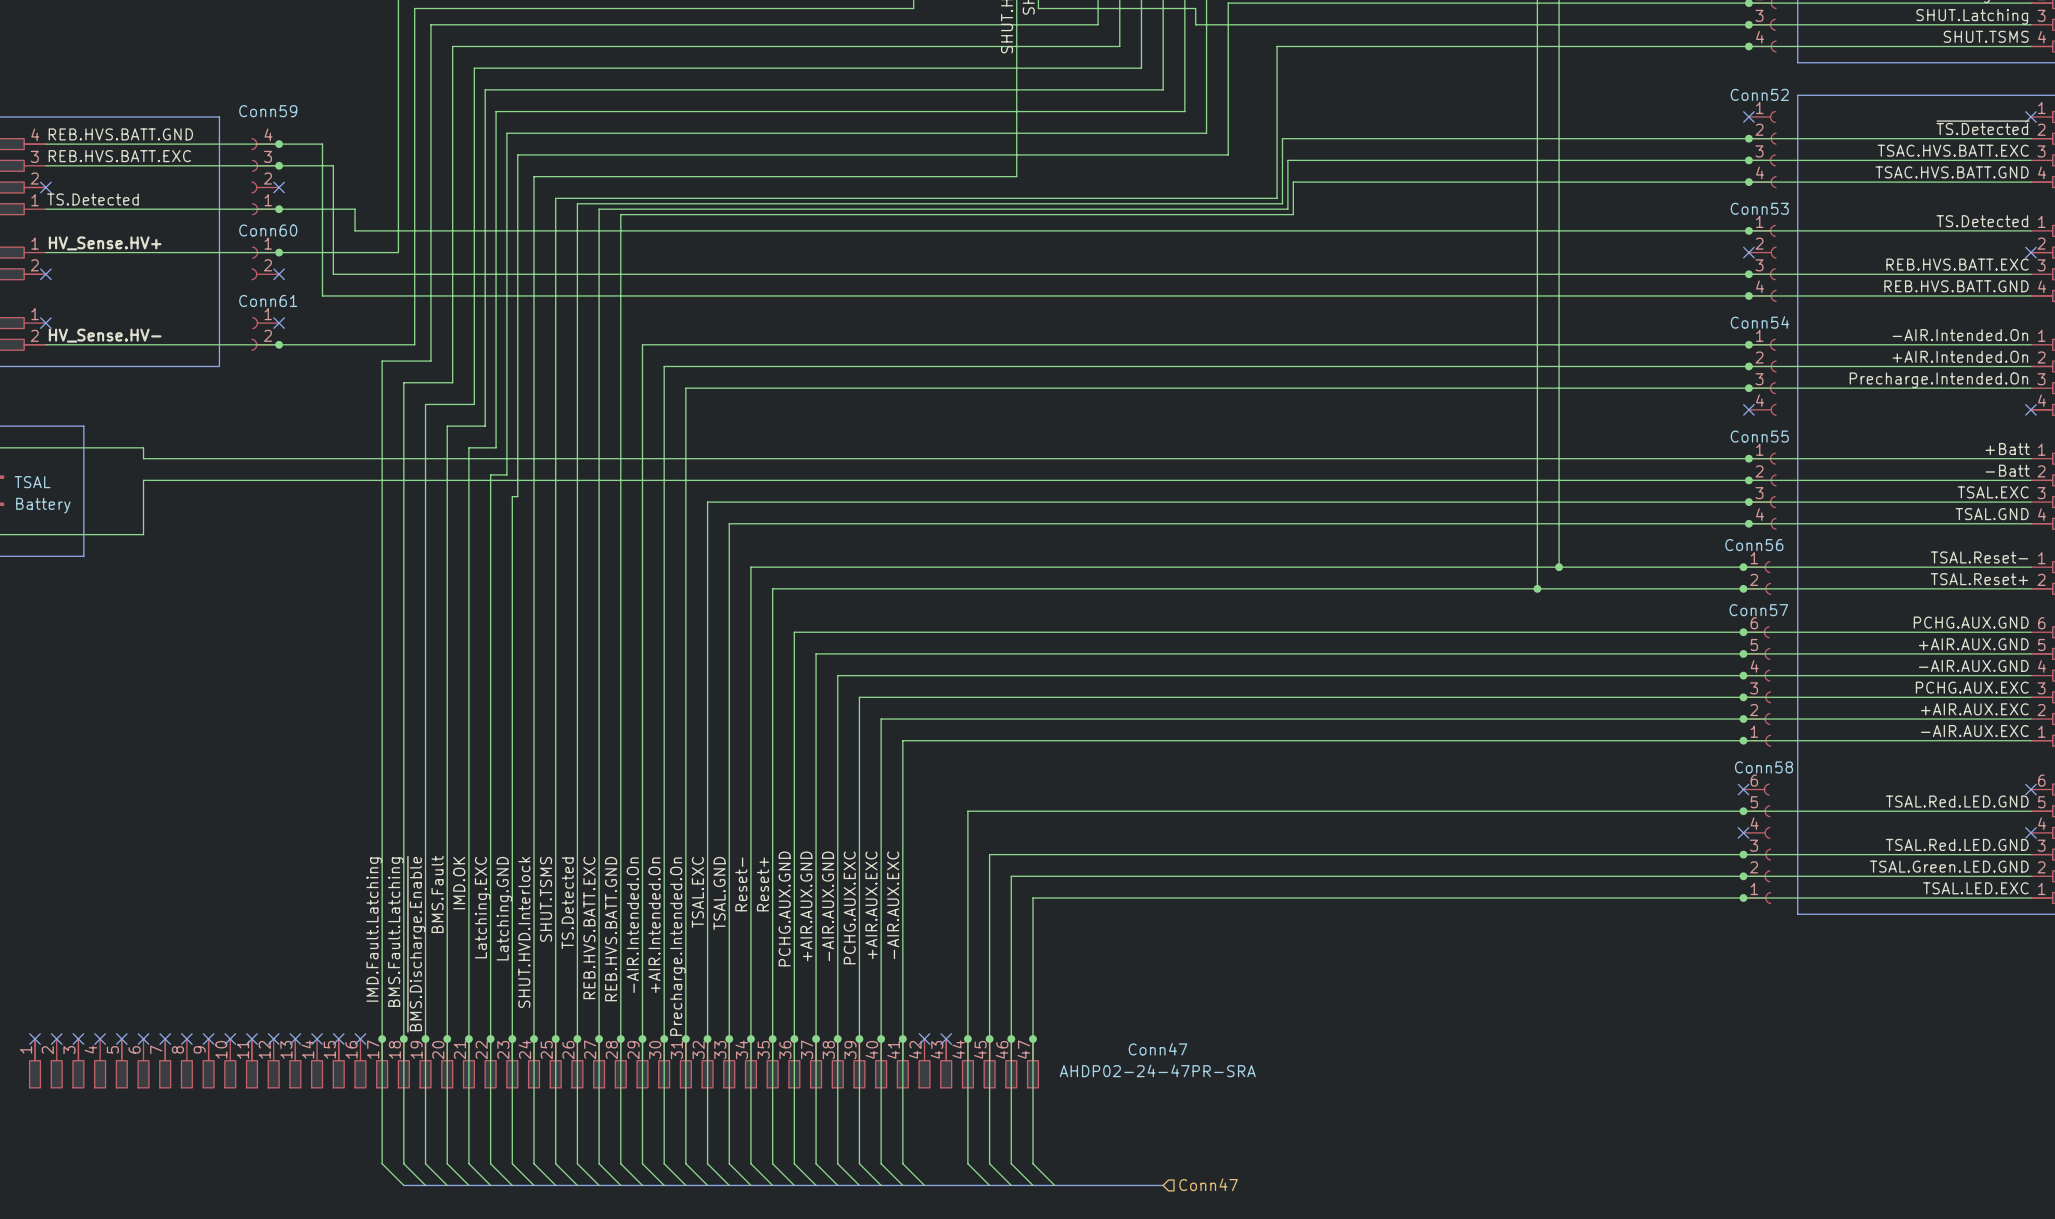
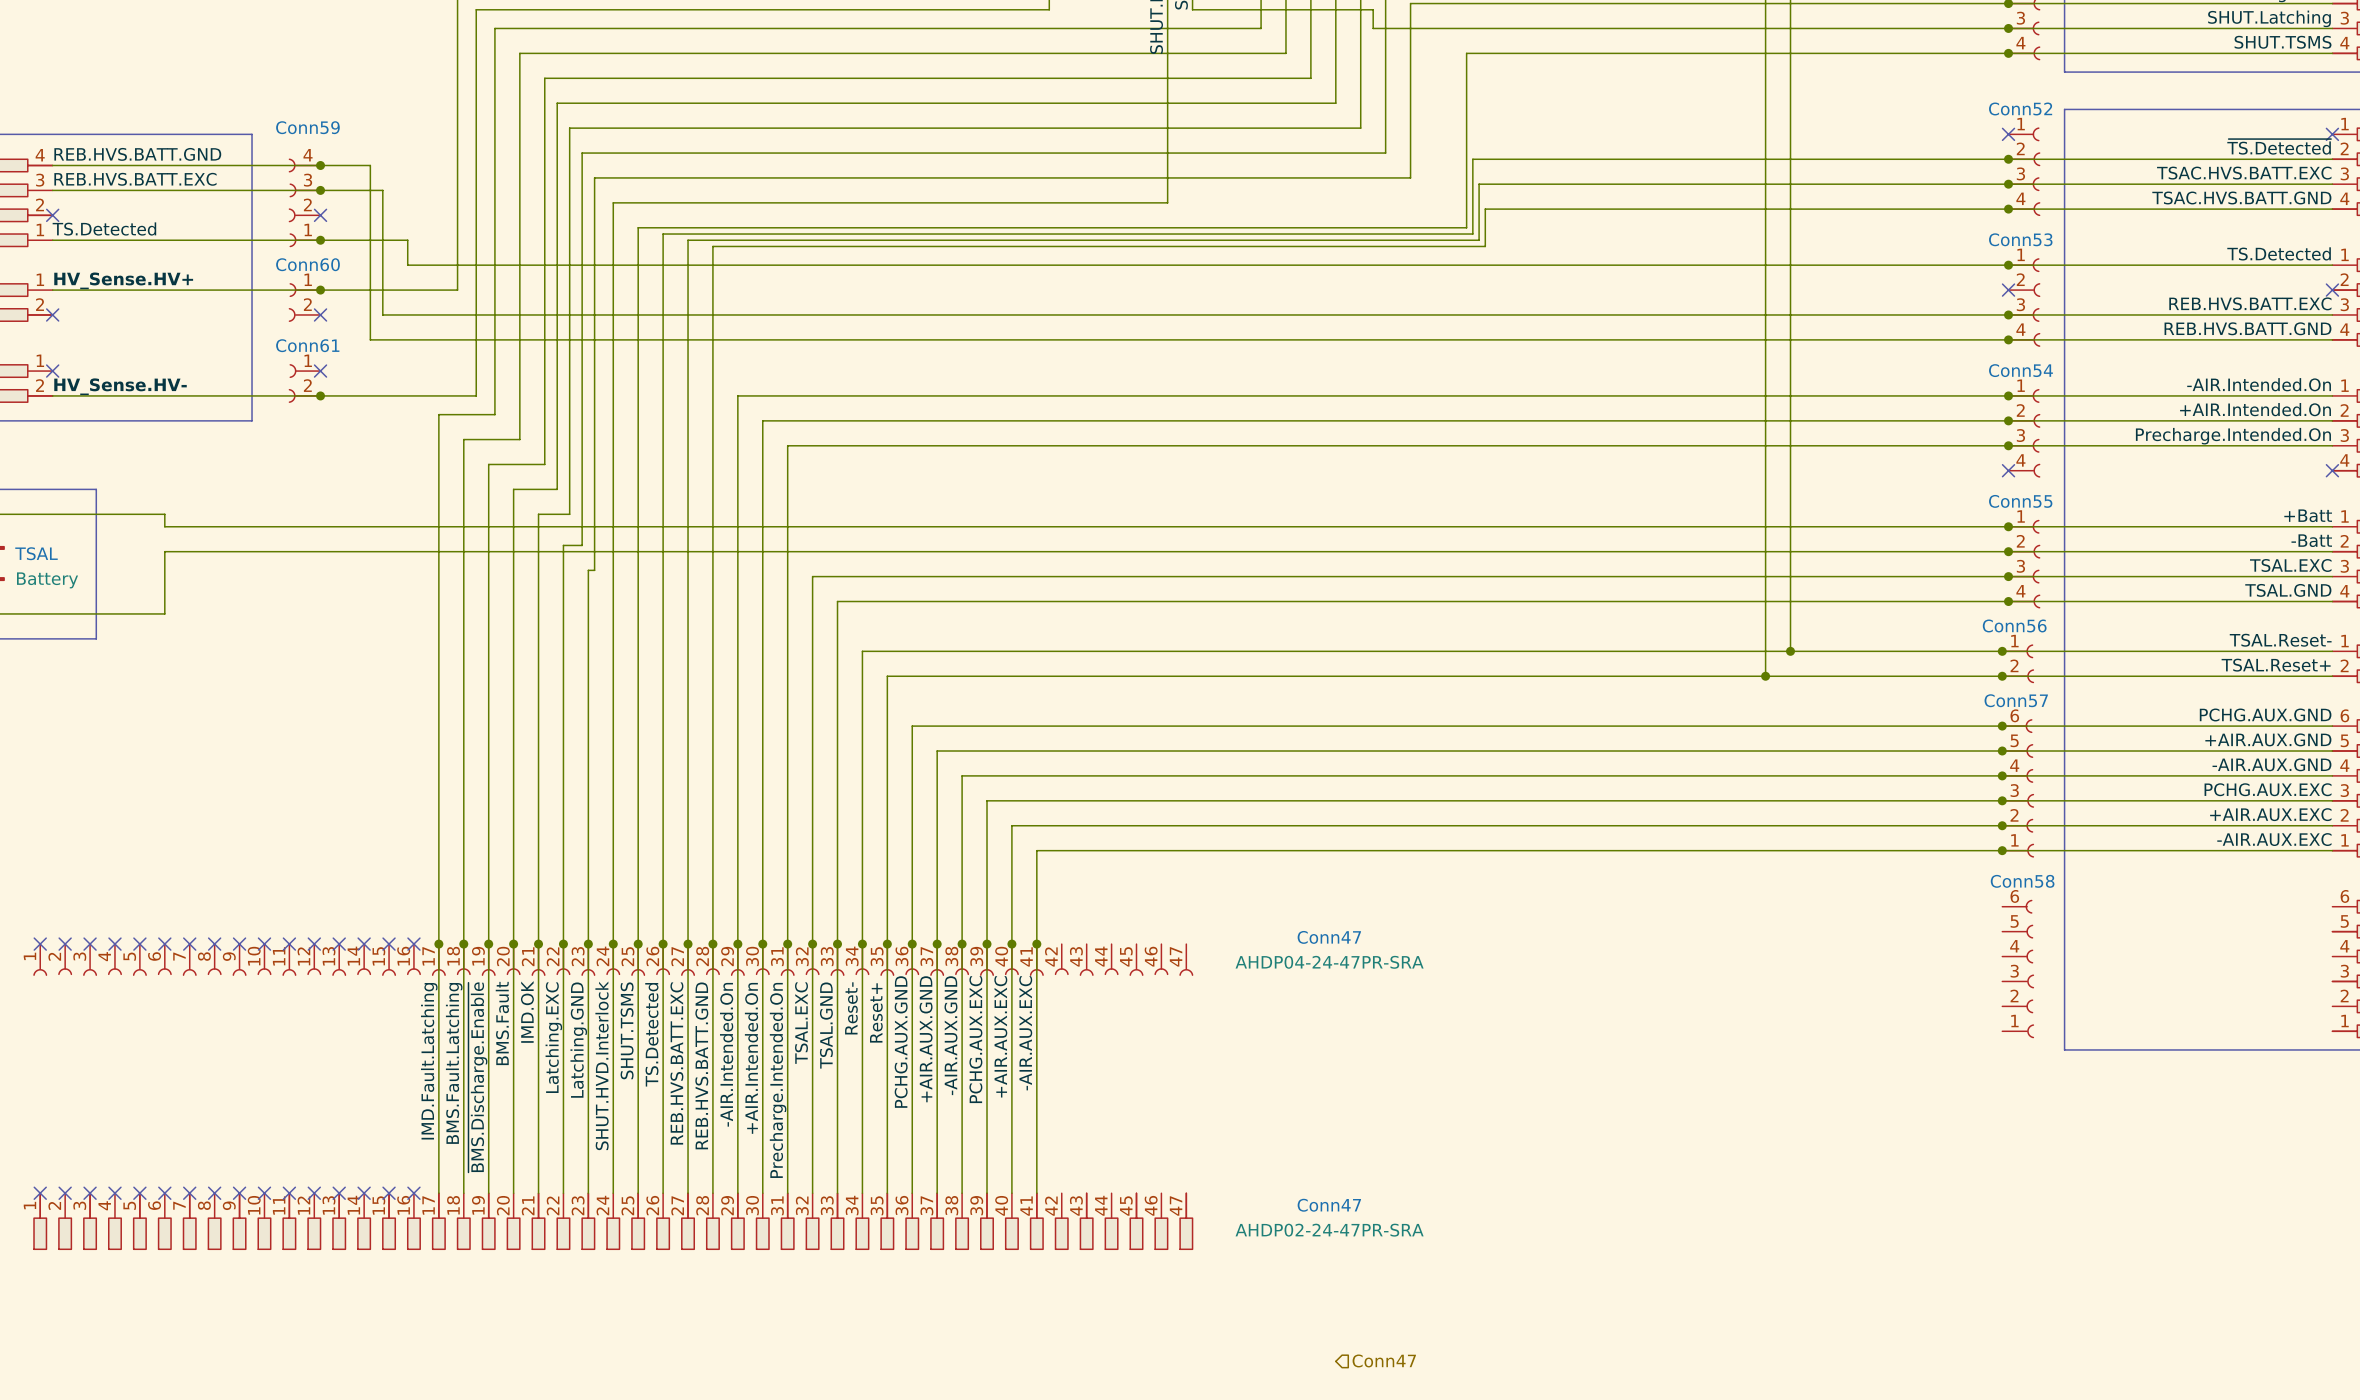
no-connect mark: (1743, 789) -> none
no-connect mark: (2030, 789) -> none
label: TSAL.Red.LED.GND (1957, 801) -> none
junction: (1743, 811) -> none
wire: (2030, 811) (967, 811) (967, 1163) (989, 1185) -> none
no-connect mark: none -> (40, 944)
no-connect mark: none -> (65, 944)
no-connect mark: none -> (90, 944)
no-connect mark: none -> (114, 944)
no-connect mark: none -> (139, 944)
no-connect mark: none -> (164, 944)
no-connect mark: none -> (189, 944)
no-connect mark: none -> (214, 944)
no-connect mark: none -> (239, 944)
no-connect mark: none -> (264, 944)
no-connect mark: none -> (289, 944)
no-connect mark: none -> (314, 944)
no-connect mark: none -> (339, 944)
no-connect mark: none -> (364, 944)
no-connect mark: none -> (389, 944)
no-connect mark: none -> (413, 944)
junction: none -> (438, 944)
junction: none -> (463, 944)
junction: none -> (488, 944)
junction: none -> (513, 944)
junction: none -> (538, 944)
junction: none -> (563, 944)
junction: none -> (588, 944)
junction: none -> (613, 944)
junction: none -> (638, 944)
junction: none -> (663, 944)
junction: none -> (688, 944)
junction: none -> (712, 944)
junction: none -> (737, 944)
junction: none -> (762, 944)
junction: none -> (787, 944)
junction: none -> (812, 944)
junction: none -> (837, 944)
junction: none -> (862, 944)
junction: none -> (887, 944)
junction: none -> (912, 944)
junction: none -> (937, 944)
junction: none -> (962, 944)
junction: none -> (987, 944)
junction: none -> (1011, 944)
junction: none -> (1036, 944)
no-connect mark: (1743, 832) -> none
no-connect mark: (2030, 832) -> none
Conn47: none -> (613, 959)
label: TSAL.Red.LED.GND (1957, 844) -> none
junction: (1743, 854) -> none
wire: (2030, 854) (989, 854) (989, 1163) (1011, 1185) -> none
label: TSAL.Green.LED.GND (1949, 866) -> none
junction: (1743, 876) -> none
wire: (2030, 876) (1011, 876) (1011, 1163) (1032, 1185) -> none
label: TSAL.LED.EXC (1975, 888) -> none
junction: (1743, 898) -> none
wire: (2030, 898) (1032, 898) (1032, 1163) (1054, 1185) -> none
wire: (382, 1039) (382, 1163) (403, 1185) -> none
junction: (382, 1039) -> none
wire: (403, 1039) (403, 1163) (425, 1185) -> none
junction: (403, 1039) -> none
wire: (425, 1039) (425, 1163) (447, 1185) -> none
junction: (425, 1039) -> none
wire: (447, 1039) (447, 1163) (468, 1185) -> none
junction: (447, 1039) -> none
wire: (468, 1039) (468, 1163) (490, 1185) -> none
junction: (468, 1039) -> none
wire: (490, 1039) (490, 1163) (512, 1185) -> none
junction: (490, 1039) -> none
wire: (512, 1039) (512, 1163) (534, 1185) -> none
junction: (512, 1039) -> none
wire: (534, 1039) (534, 1163) (555, 1185) -> none
junction: (534, 1039) -> none
wire: (555, 1039) (555, 1163) (577, 1185) -> none
junction: (555, 1039) -> none
wire: (577, 1039) (577, 1163) (599, 1185) -> none
junction: (577, 1039) -> none
wire: (599, 1039) (599, 1163) (620, 1185) -> none
junction: (599, 1039) -> none
wire: (620, 1039) (620, 1163) (642, 1185) -> none
junction: (620, 1039) -> none
wire: (642, 1039) (642, 1163) (664, 1185) -> none
junction: (642, 1039) -> none
wire: (664, 1039) (664, 1163) (685, 1185) -> none
junction: (664, 1039) -> none
wire: (685, 1039) (685, 1163) (707, 1185) -> none
junction: (685, 1039) -> none
wire: (707, 1039) (707, 1163) (729, 1185) -> none
junction: (707, 1039) -> none
wire: (729, 1039) (729, 1163) (750, 1185) -> none
junction: (729, 1039) -> none
wire: (750, 1039) (750, 1163) (772, 1185) -> none
junction: (750, 1039) -> none
wire: (772, 1039) (772, 1163) (794, 1185) -> none
junction: (772, 1039) -> none
wire: (794, 1039) (794, 1163) (816, 1185) -> none
junction: (794, 1039) -> none
wire: (816, 1039) (816, 1163) (837, 1185) -> none
junction: (816, 1039) -> none
wire: (837, 1039) (837, 1163) (859, 1185) -> none
junction: (837, 1039) -> none
wire: (859, 1039) (859, 1163) (881, 1185) -> none
junction: (859, 1039) -> none
wire: (881, 1039) (881, 1163) (902, 1185) -> none
junction: (881, 1039) -> none
wire: (902, 1039) (902, 1163) (924, 1185) -> none
junction: (902, 1039) -> none
no-connect mark: (924, 1039) -> none
no-connect mark: (946, 1039) -> none
junction: (967, 1039) -> none
junction: (989, 1039) -> none
junction: (1011, 1039) -> none
junction: (1032, 1039) -> none
bus: (403, 1185) (1163, 1185) -> none

